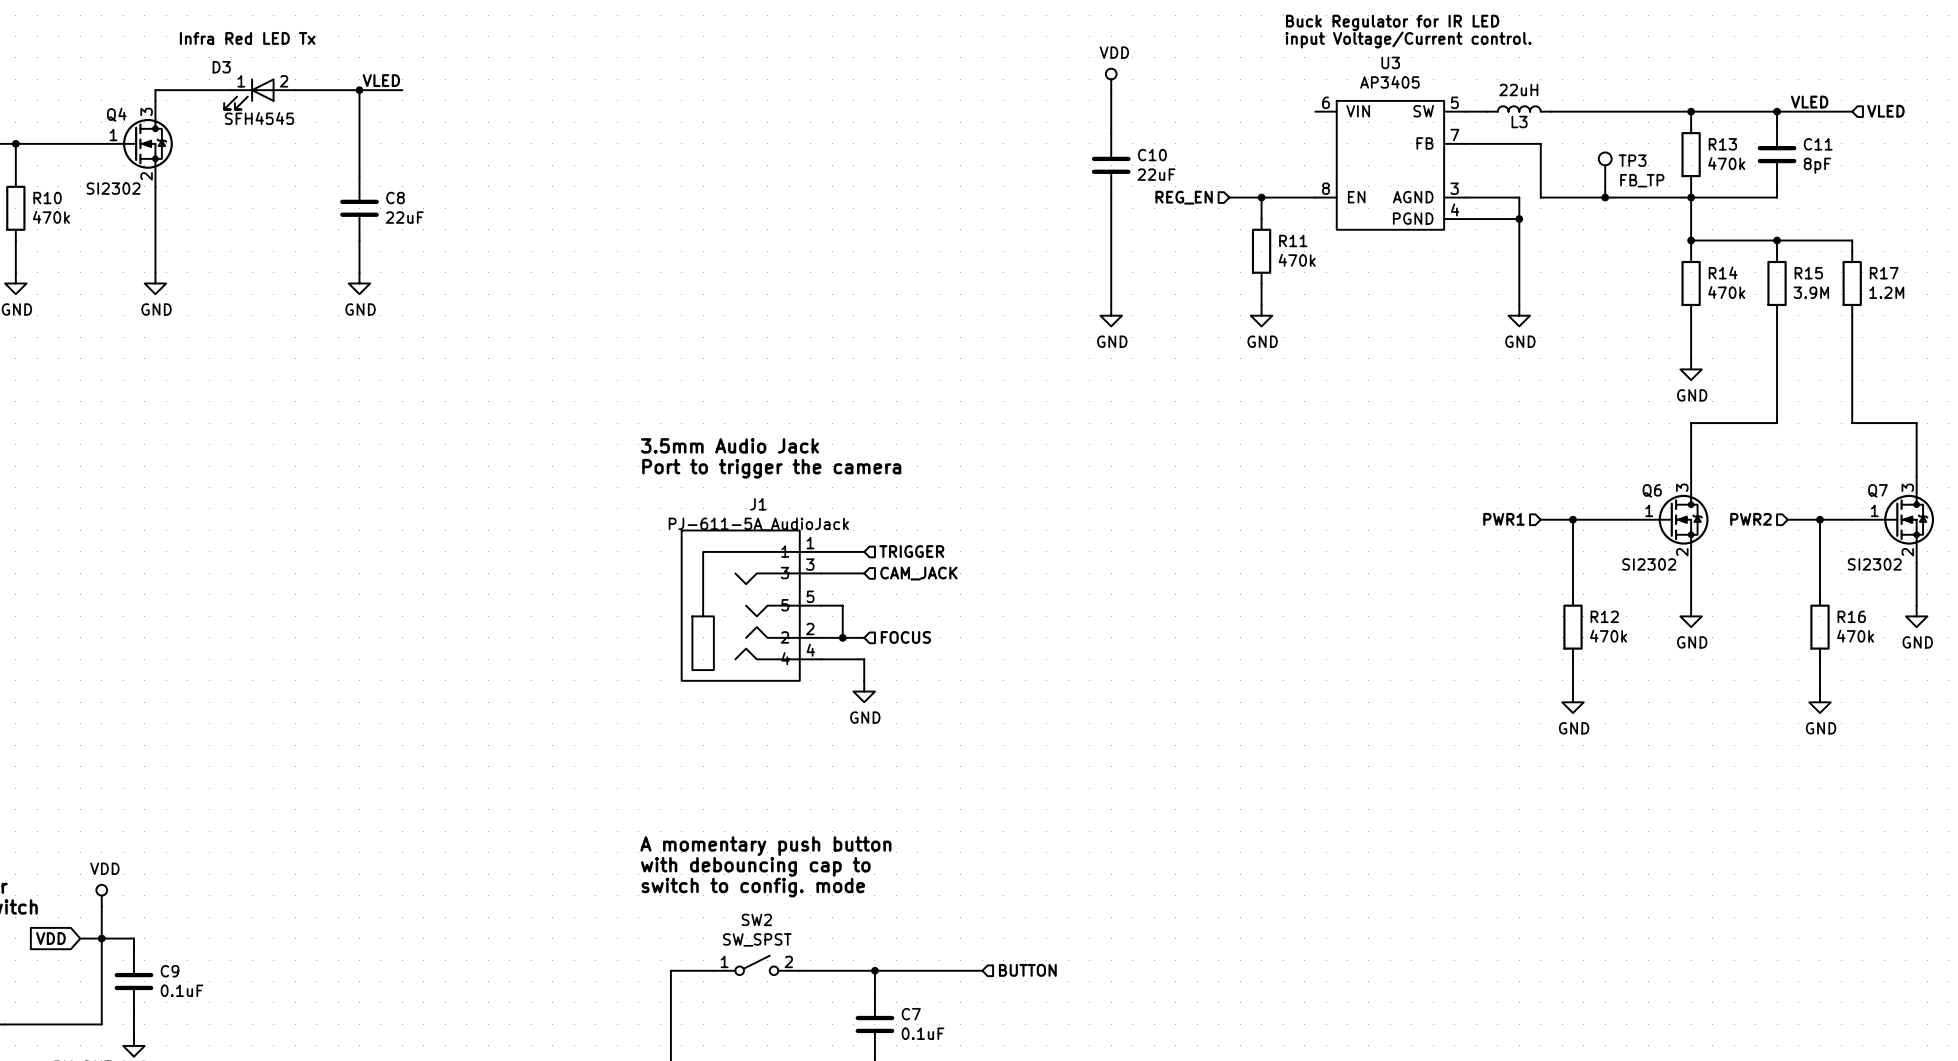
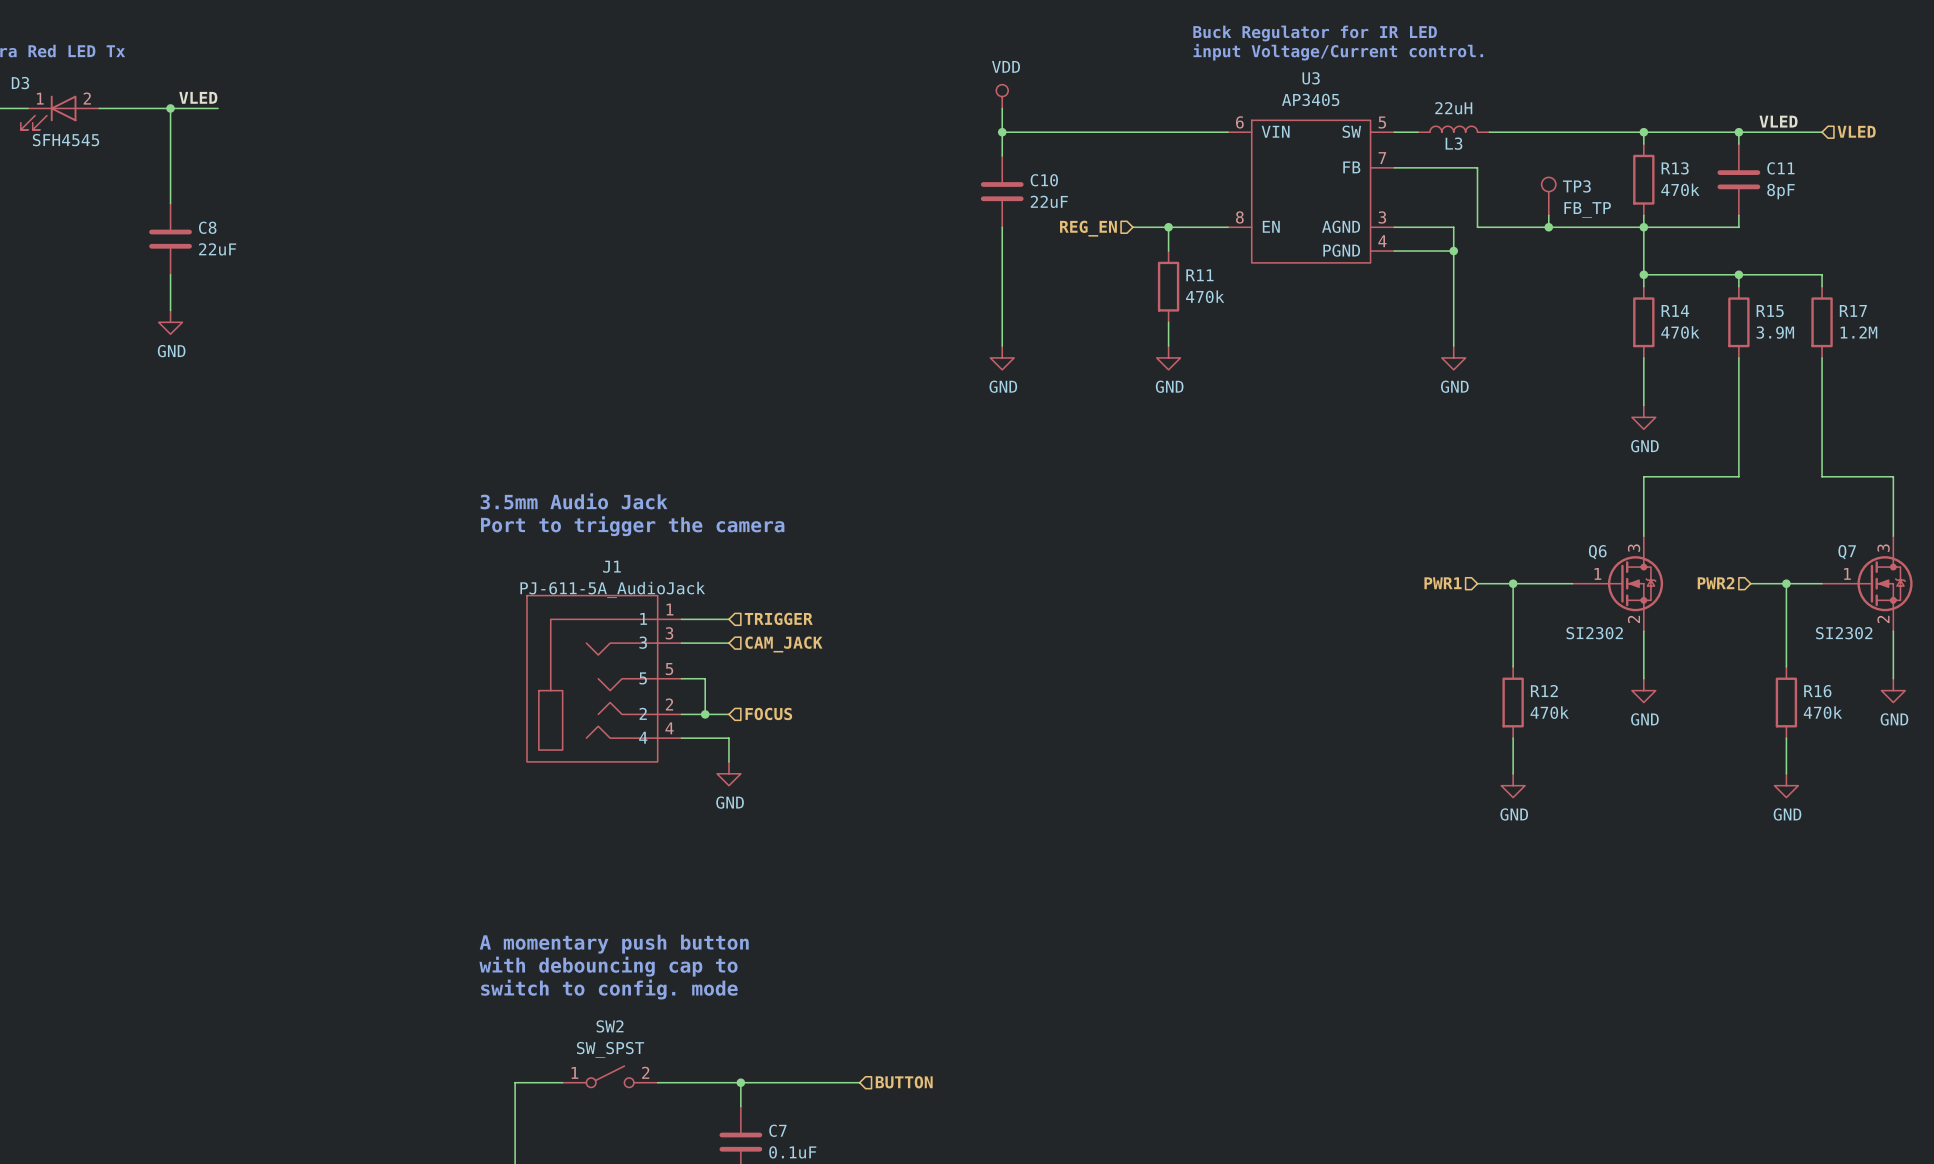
wire: none -> (1002, 132) (1227, 132)
junction: none -> (1002, 132)

